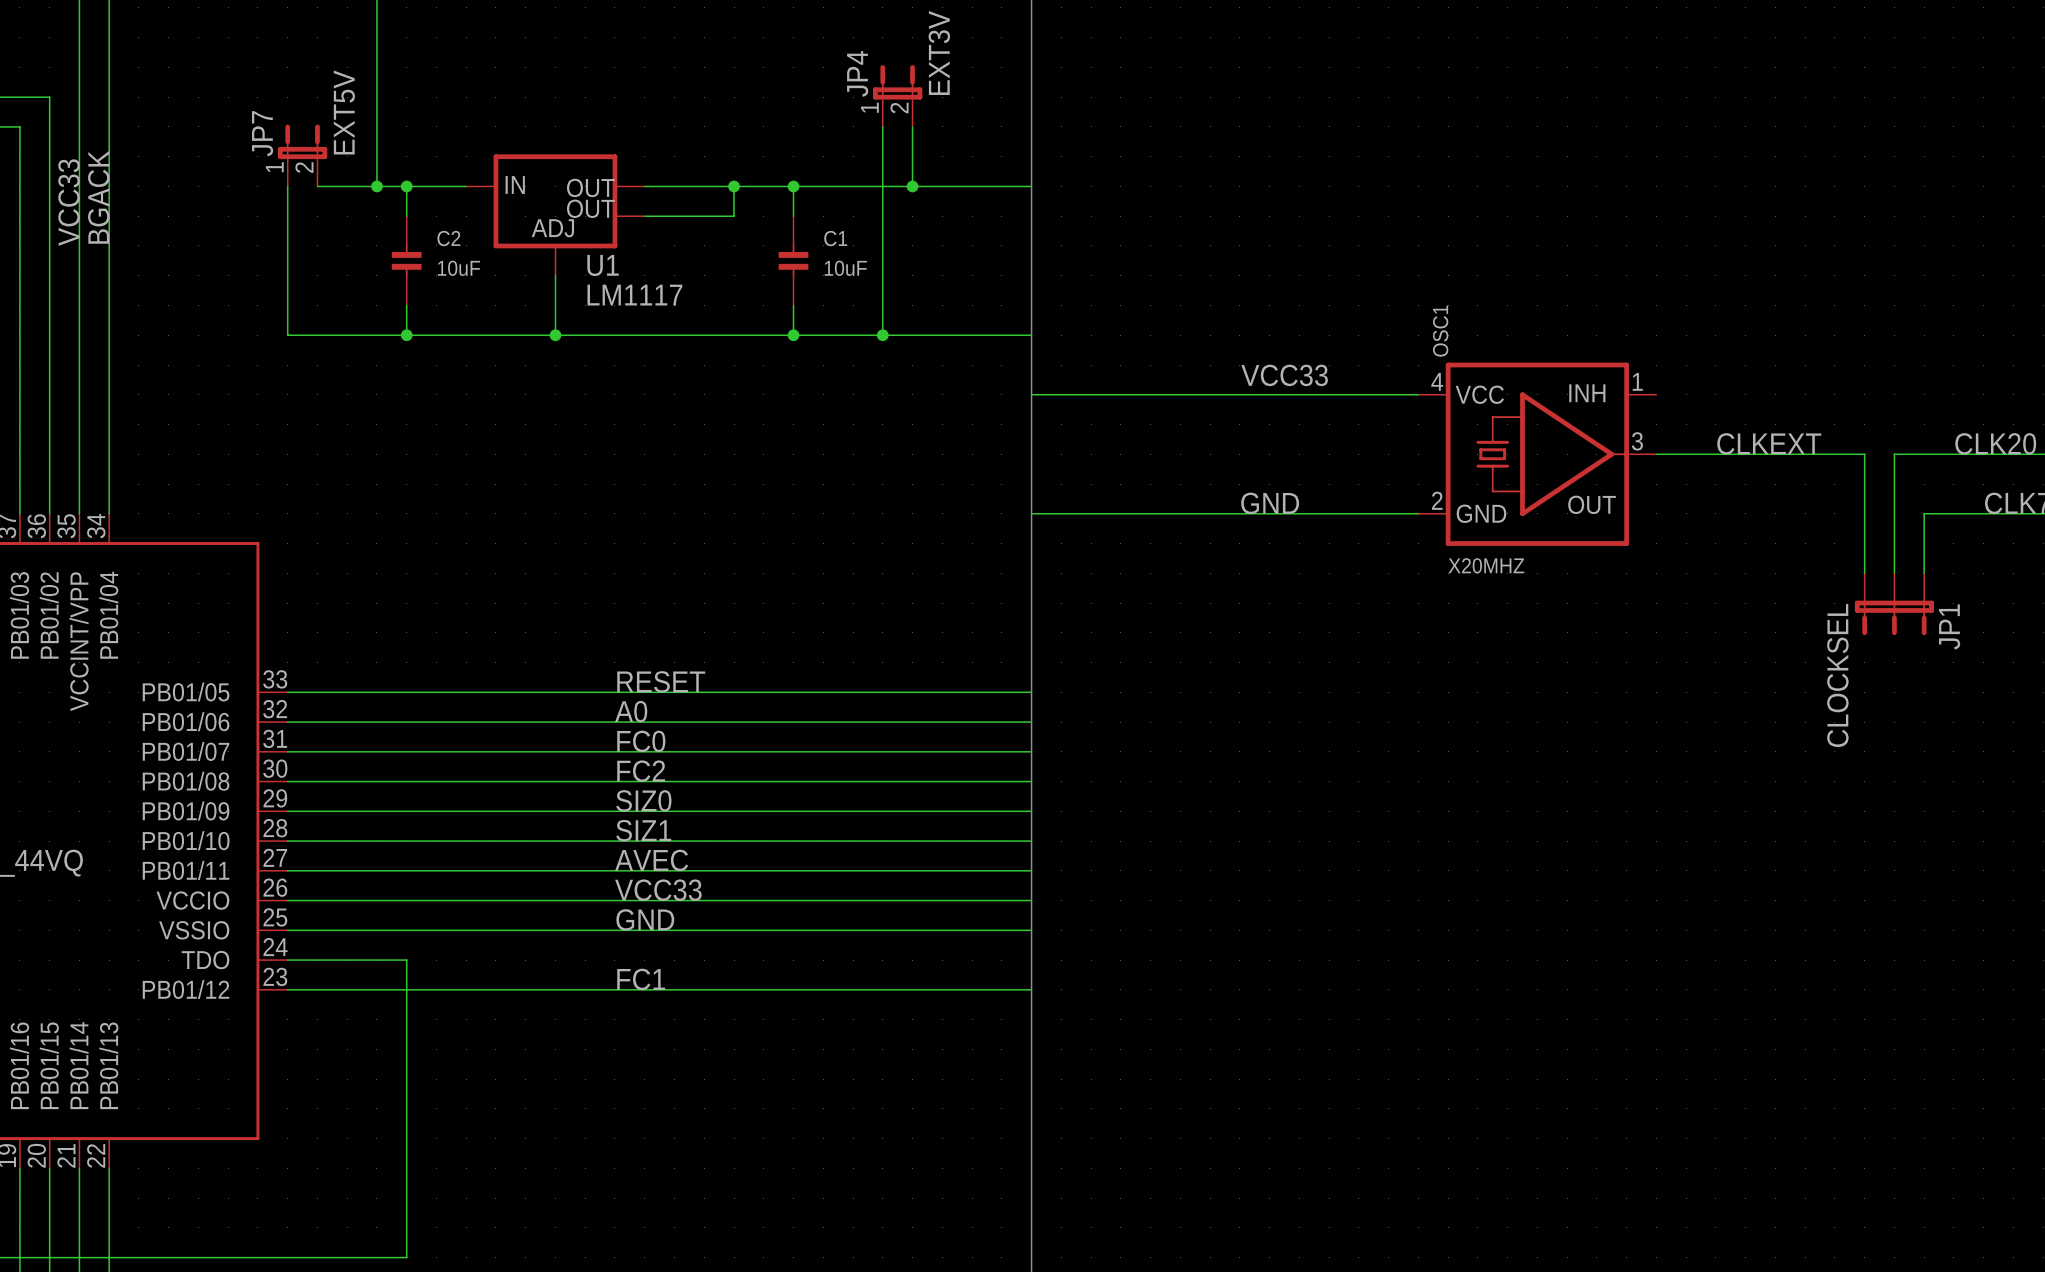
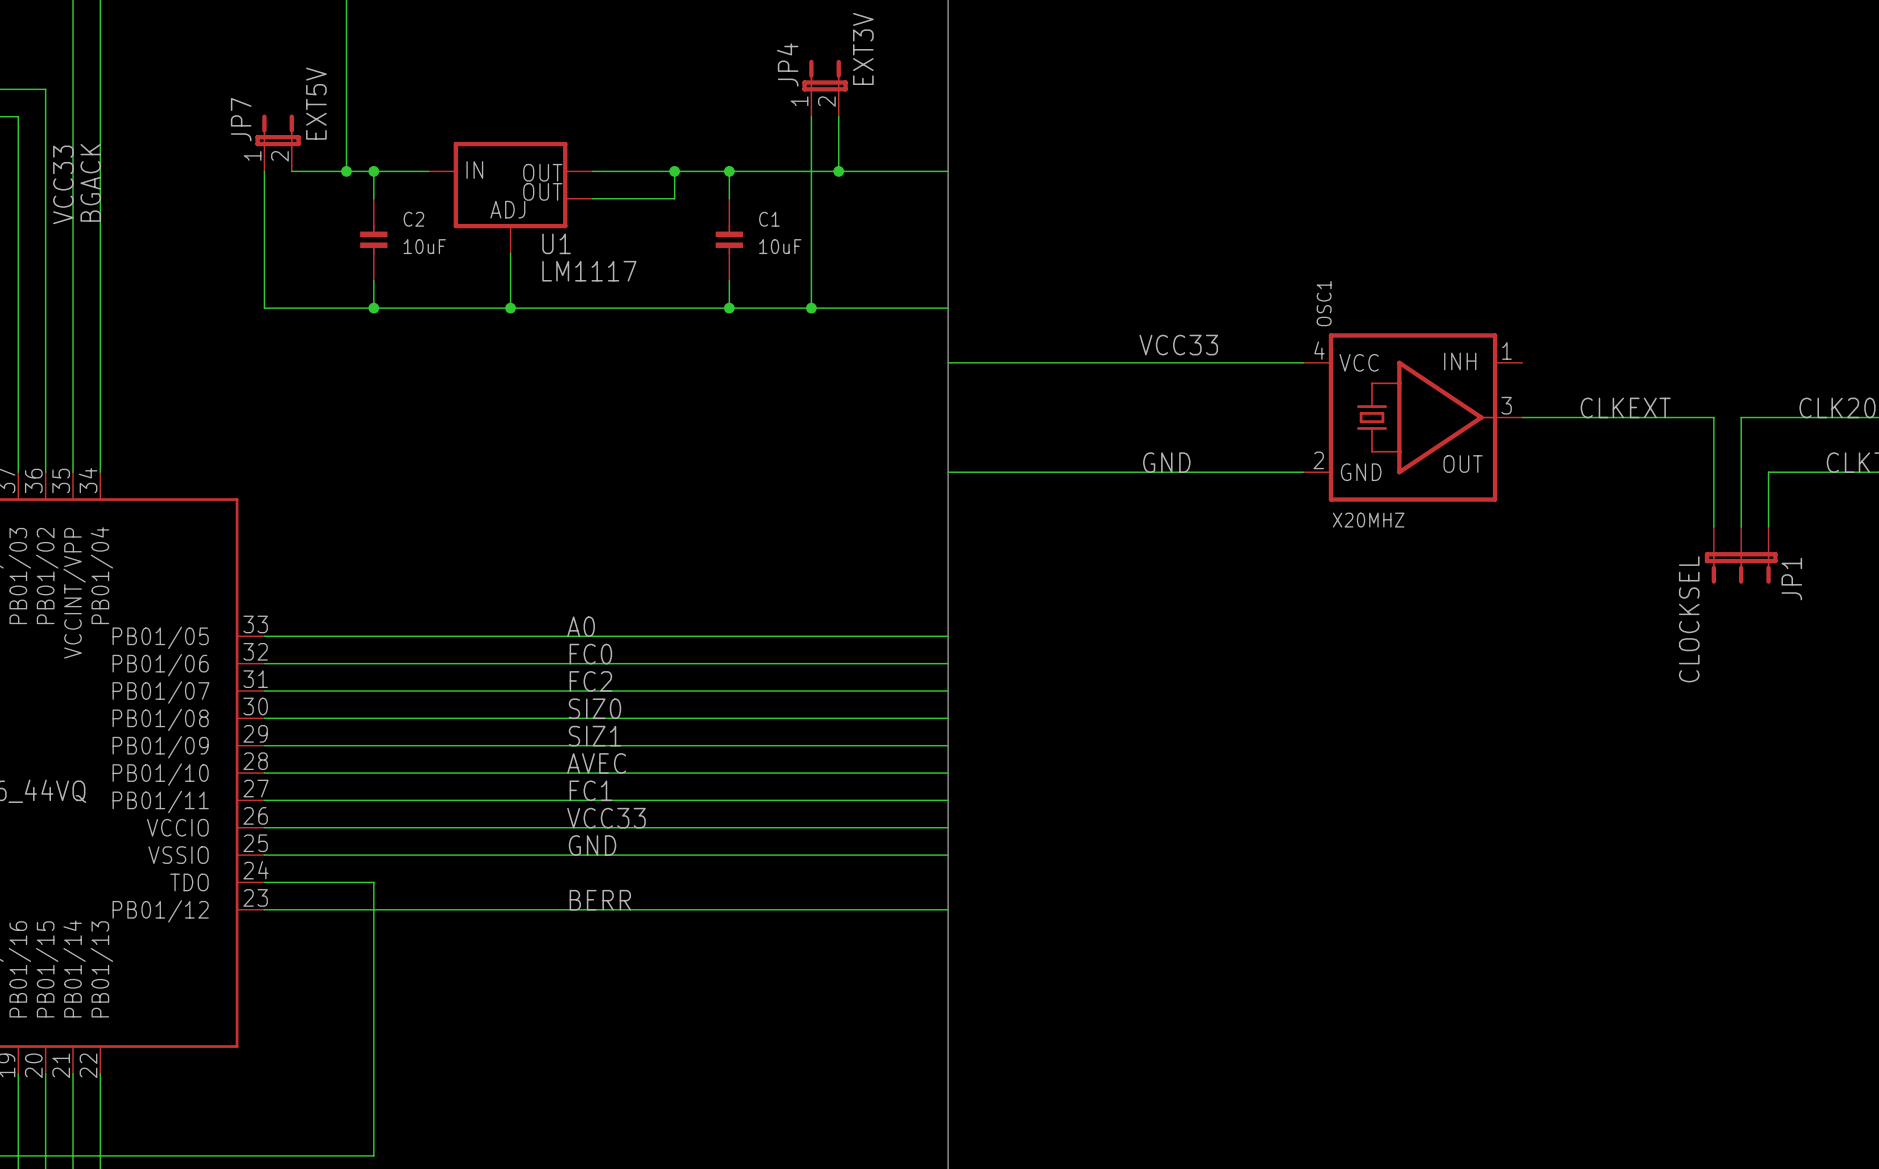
label: RESET (661, 681) -> A0 (581, 626)
label: A0 (631, 711) -> FC0 (590, 654)
label: FC0 (641, 741) -> FC2 (590, 681)
label: FC2 (641, 771) -> SIZ0 (594, 708)
label: SIZ0 (643, 800) -> SIZ1 (594, 736)
label: SIZ1 (643, 830) -> AVEC (596, 763)
label: AVEC (651, 860) -> FC1 (590, 790)
label: FC1 (641, 979) -> BERR (600, 900)

